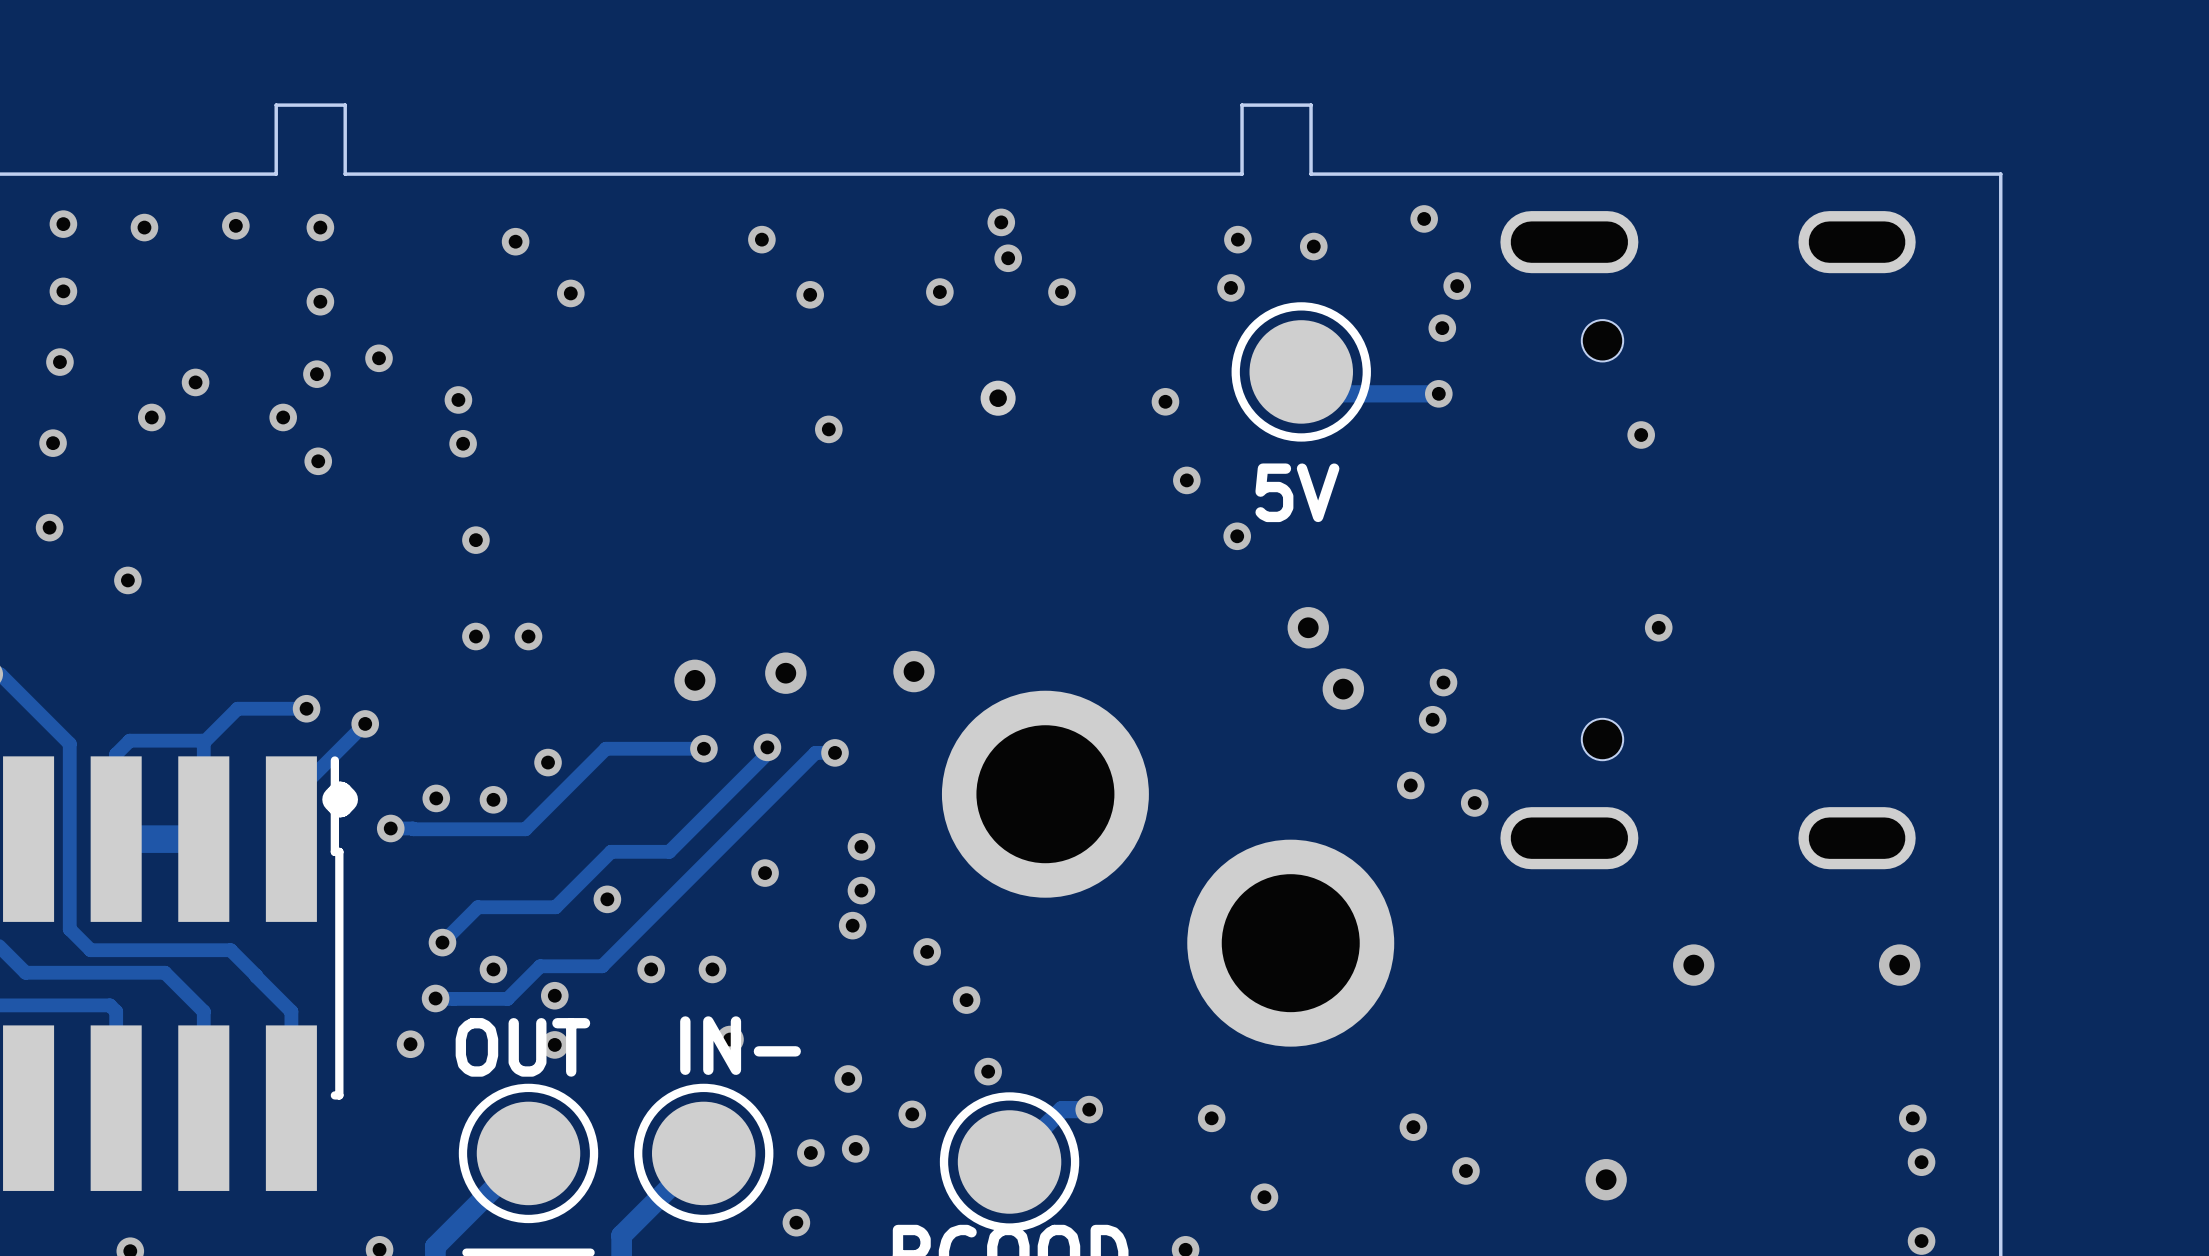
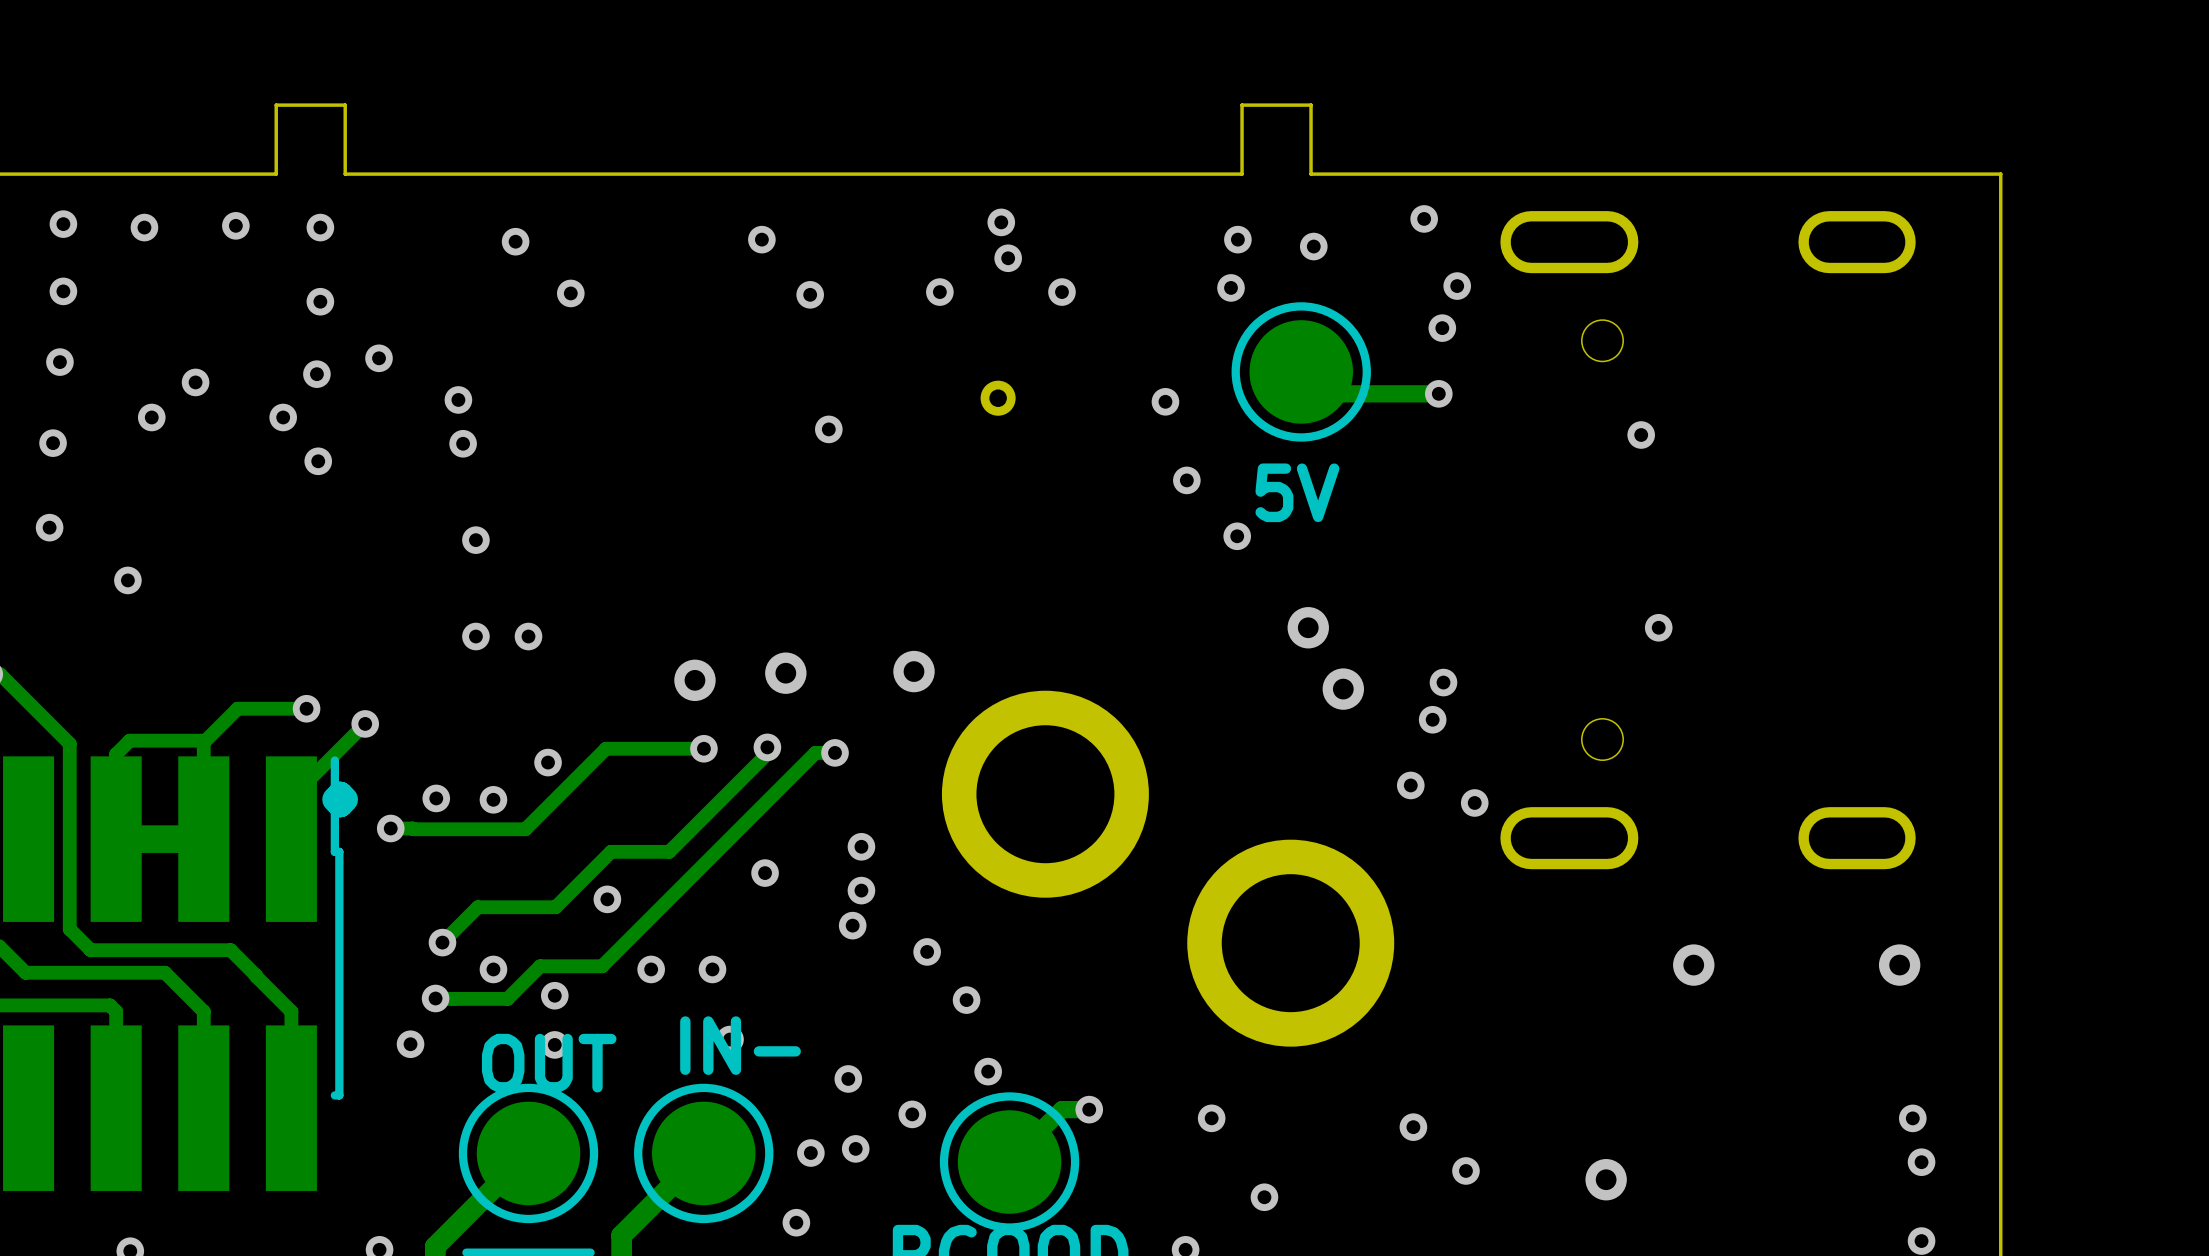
part value position: OUT (522, 1047) -> OUT (549, 1063)

